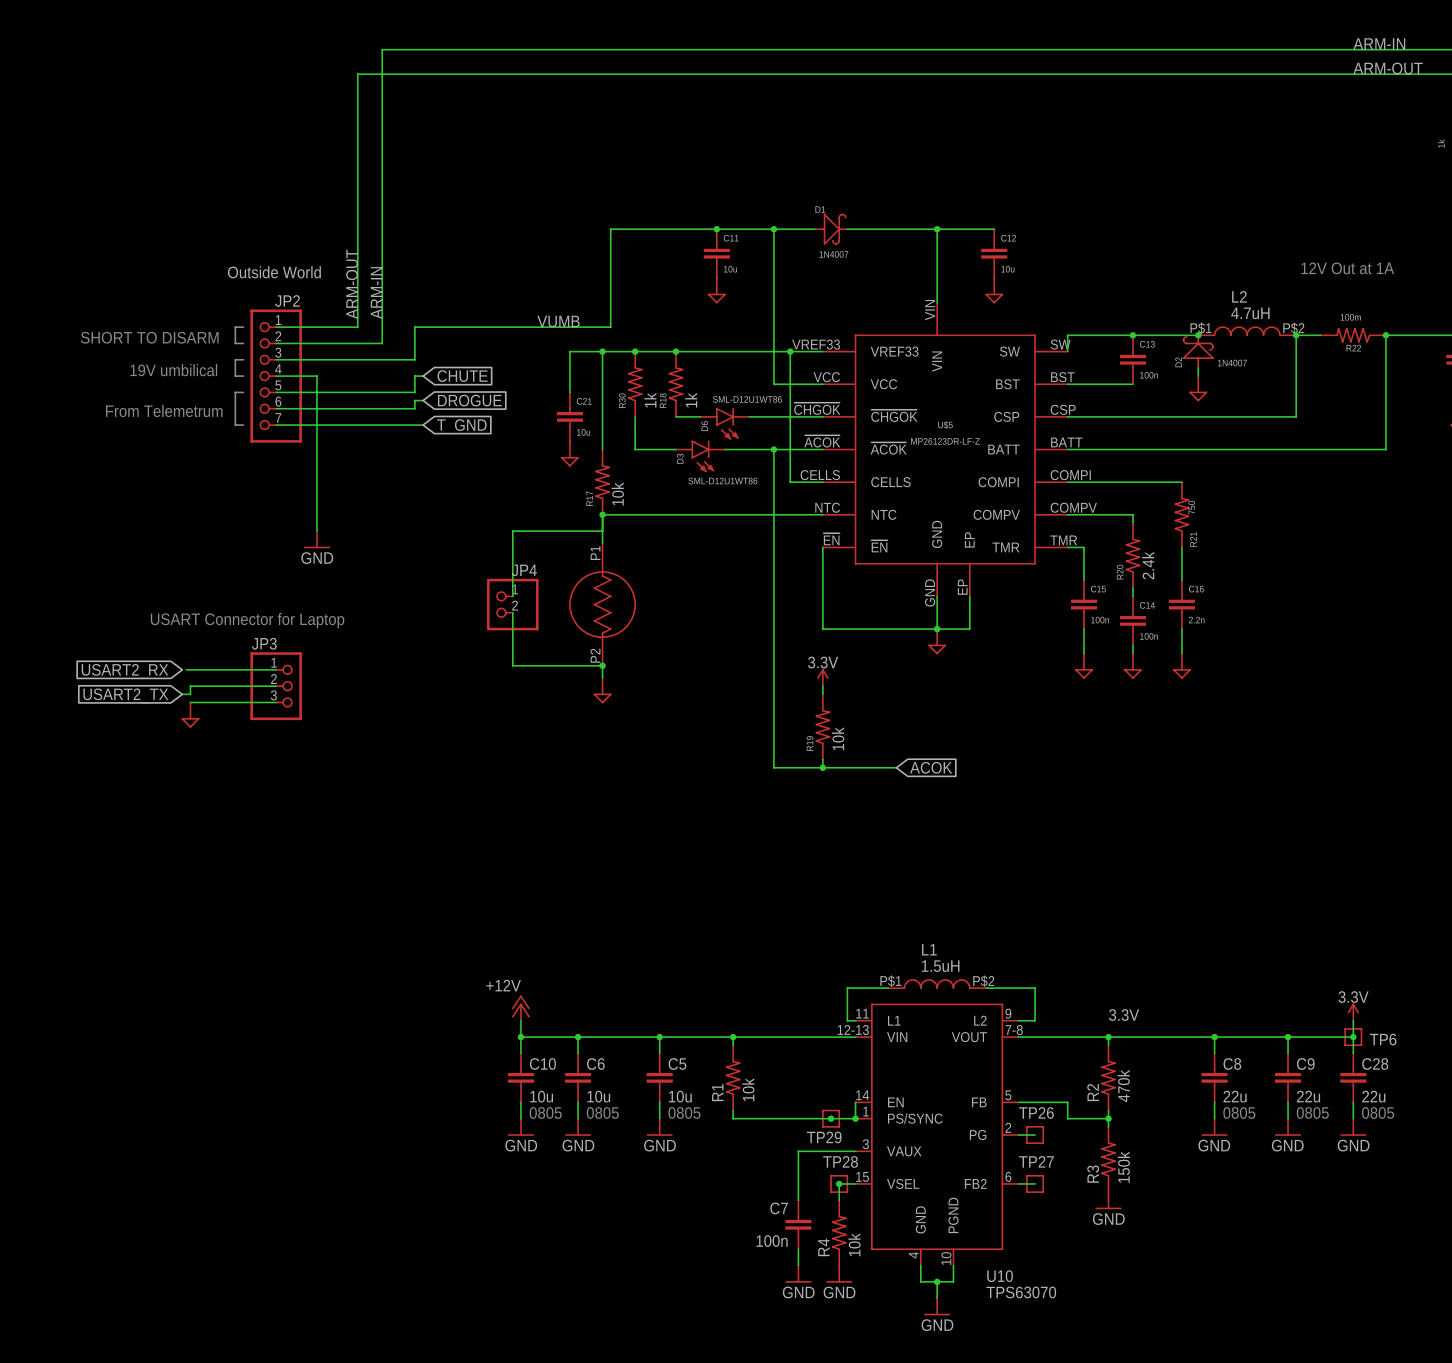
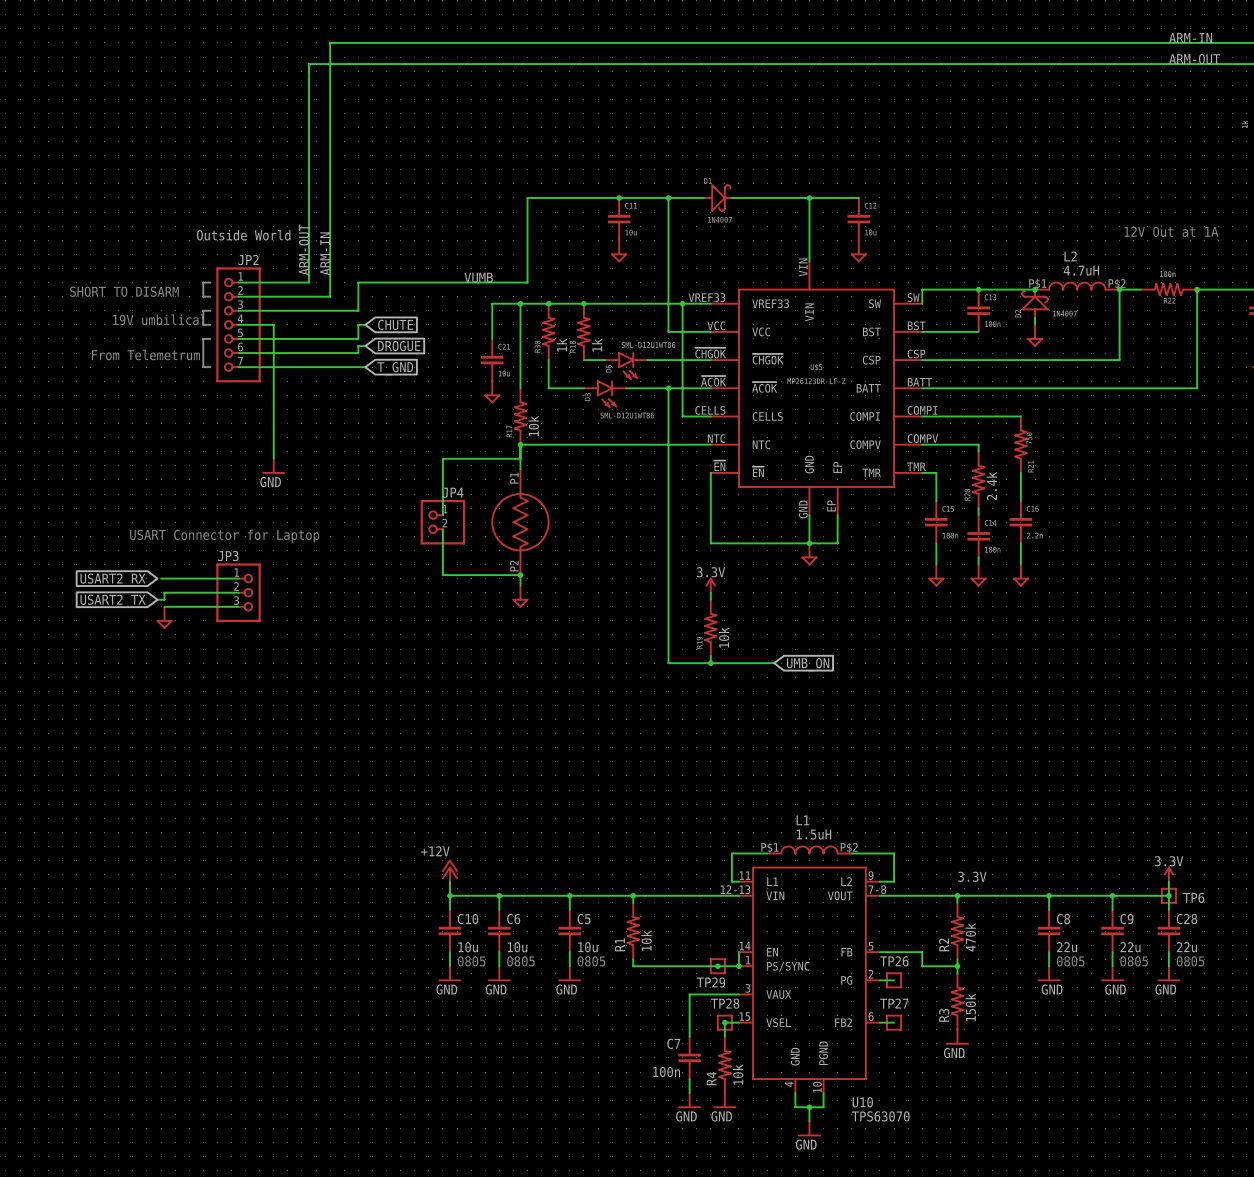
global label: ACOK (931, 767) -> UMB_ON (808, 664)

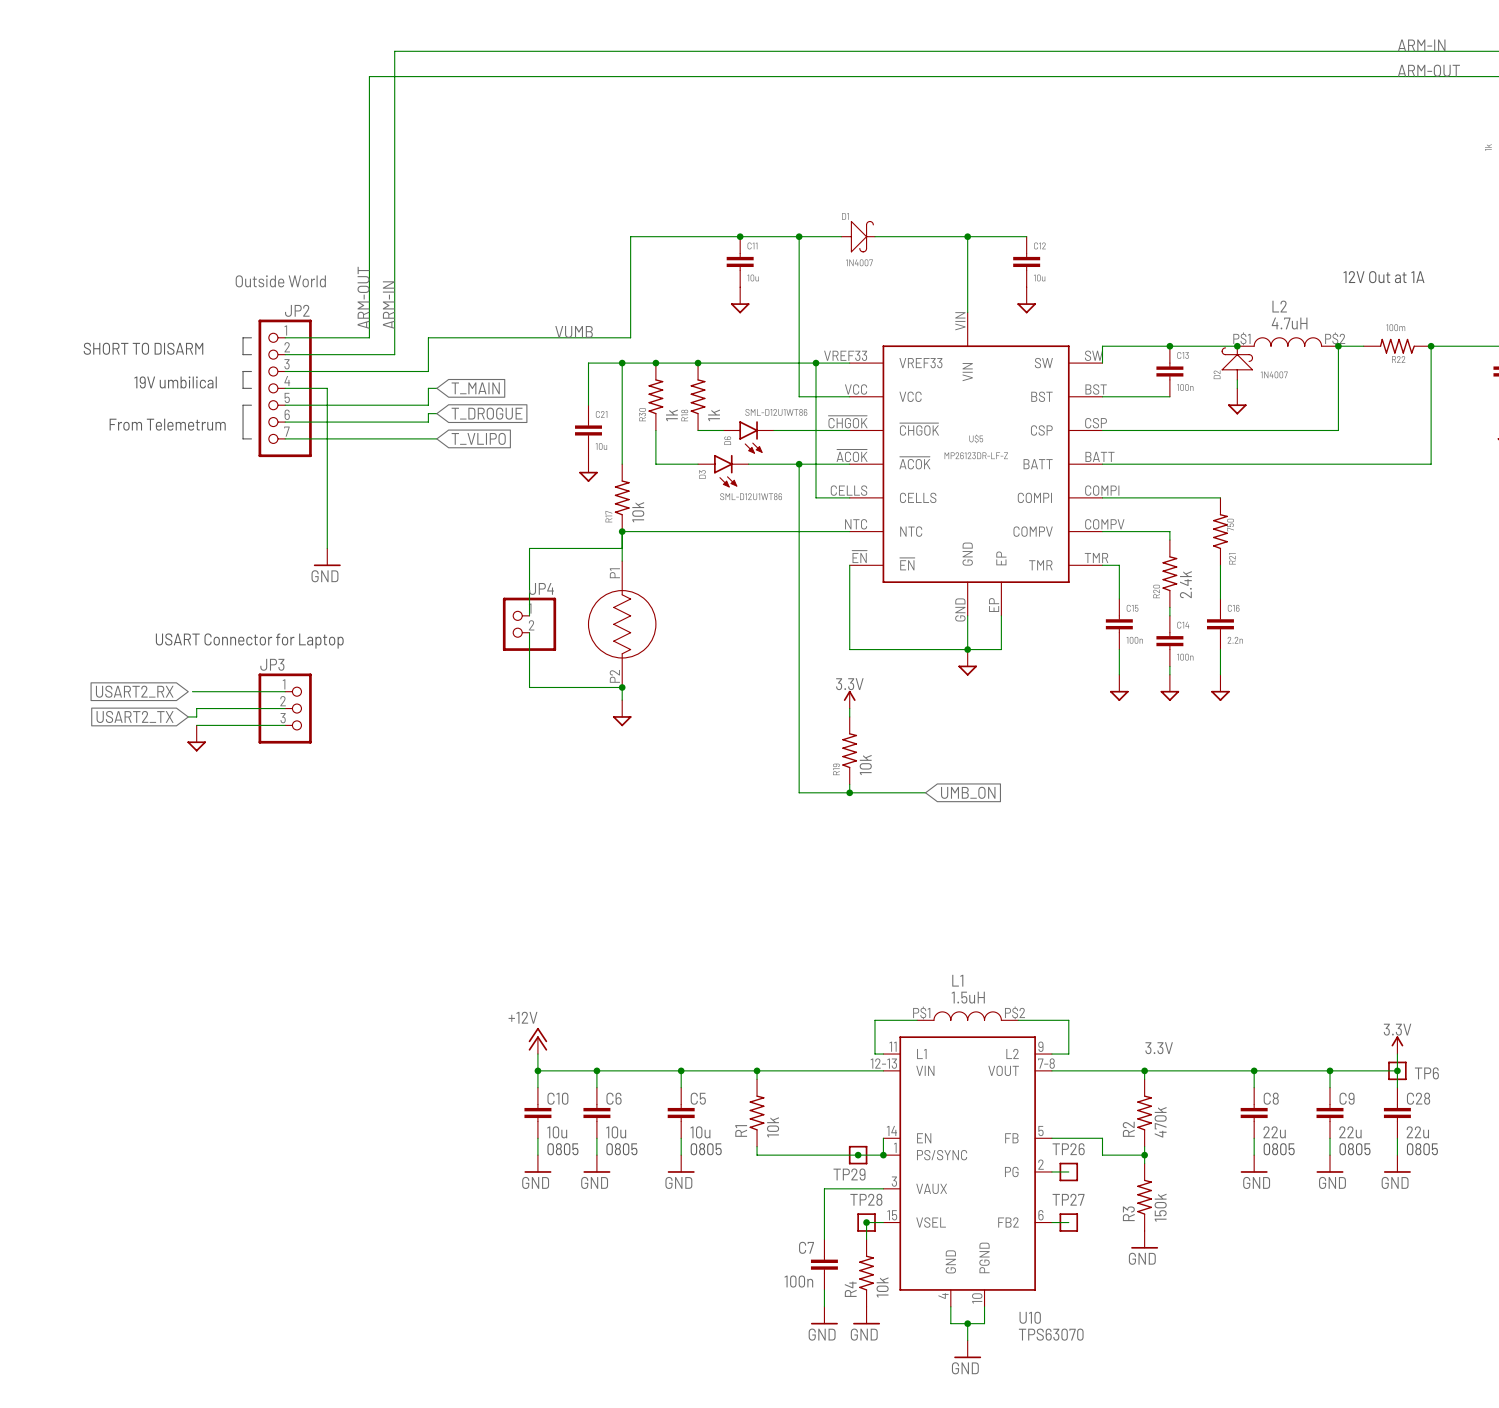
global label: CHUTE (395, 324) -> T_MAIN (475, 388)
global label: DROGUE (399, 346) -> T_DROGUE (487, 413)
global label: T_GND (395, 368) -> T_VLIPO (478, 438)

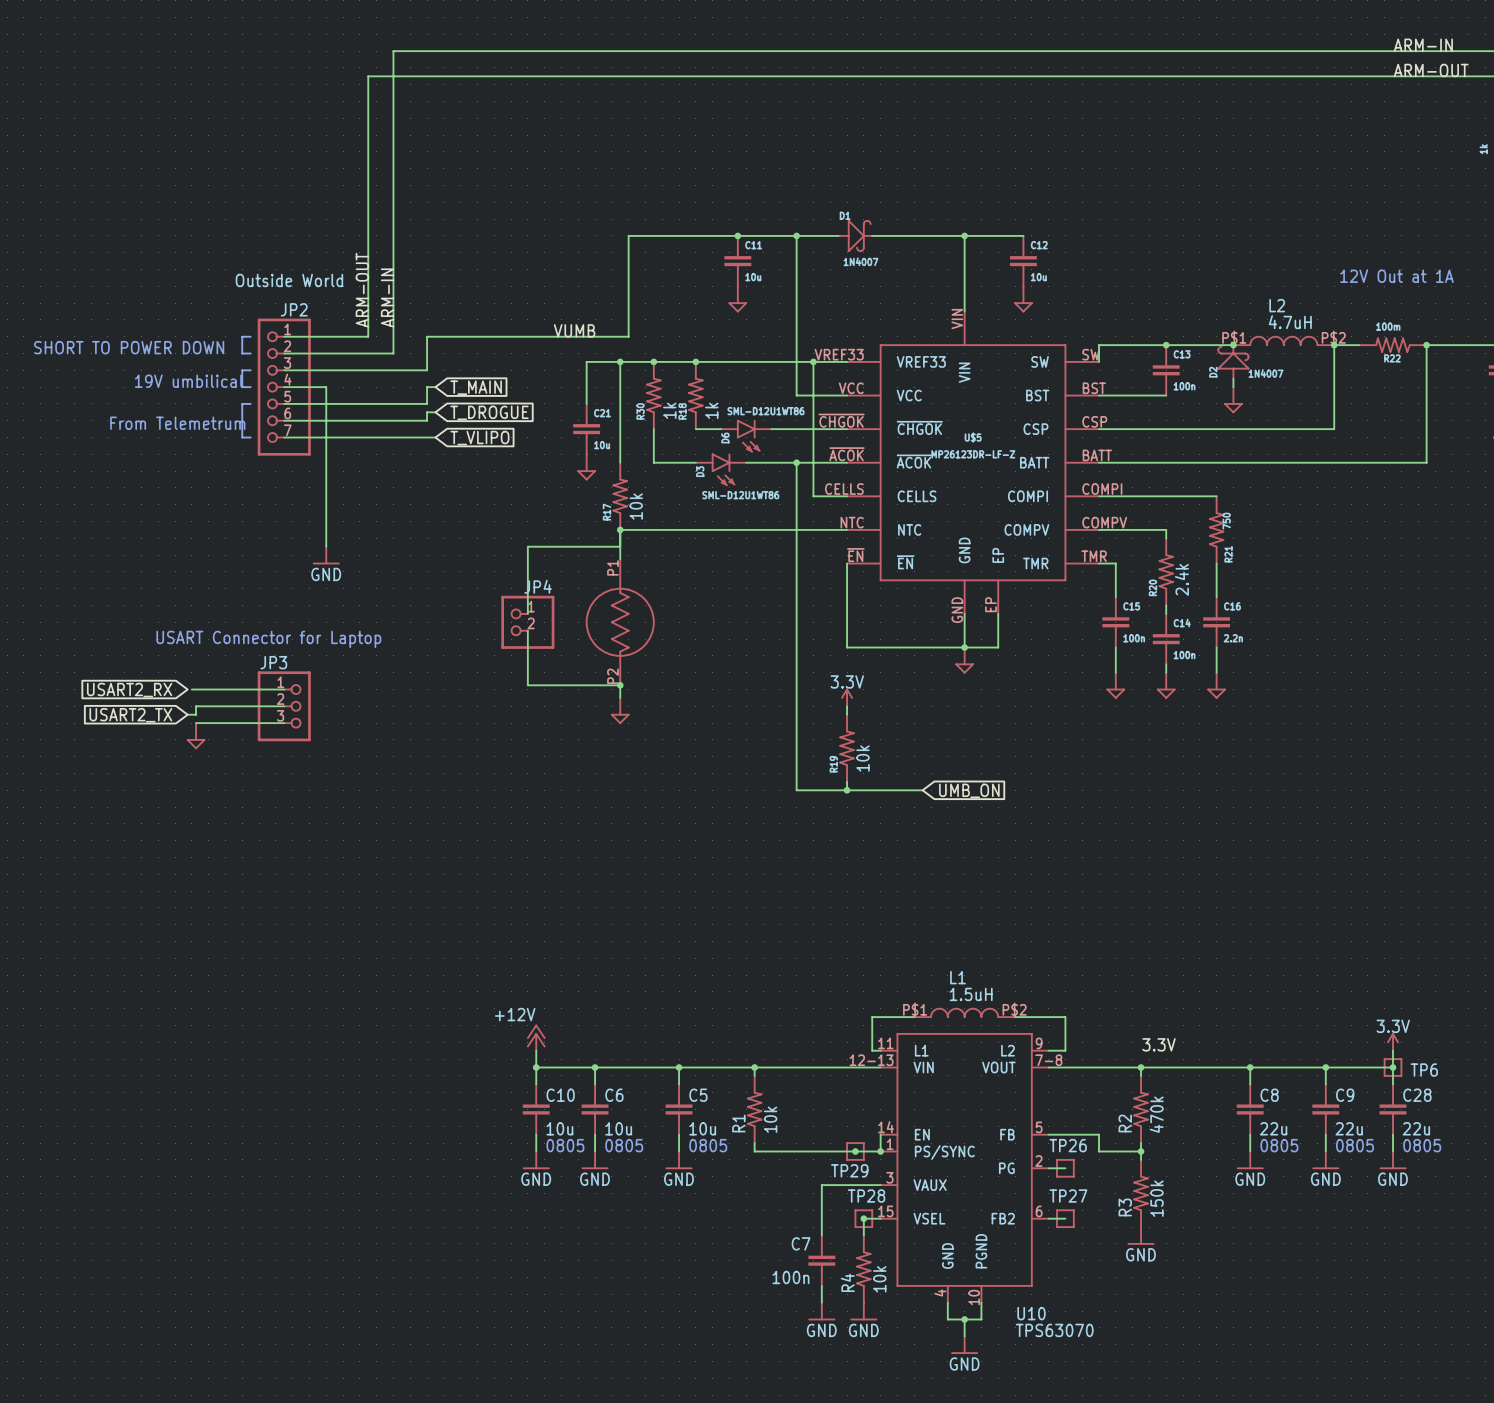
text: none -> SHORT TO POWER DOWN (129, 347)
text: SHORT TO DISARM (143, 348) -> none

